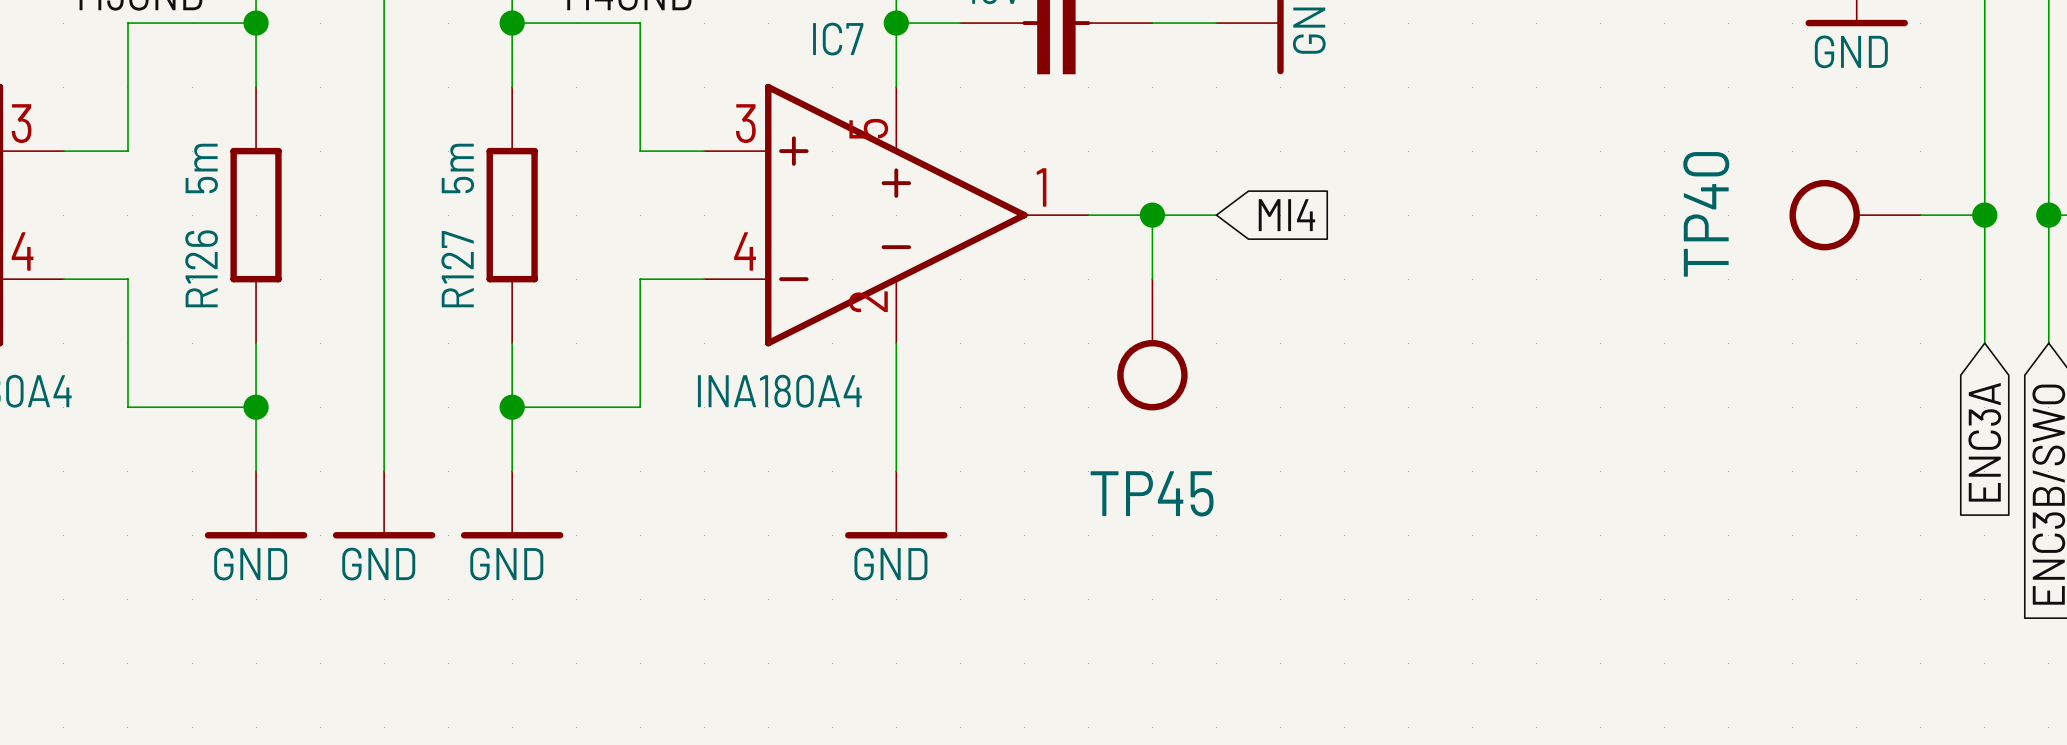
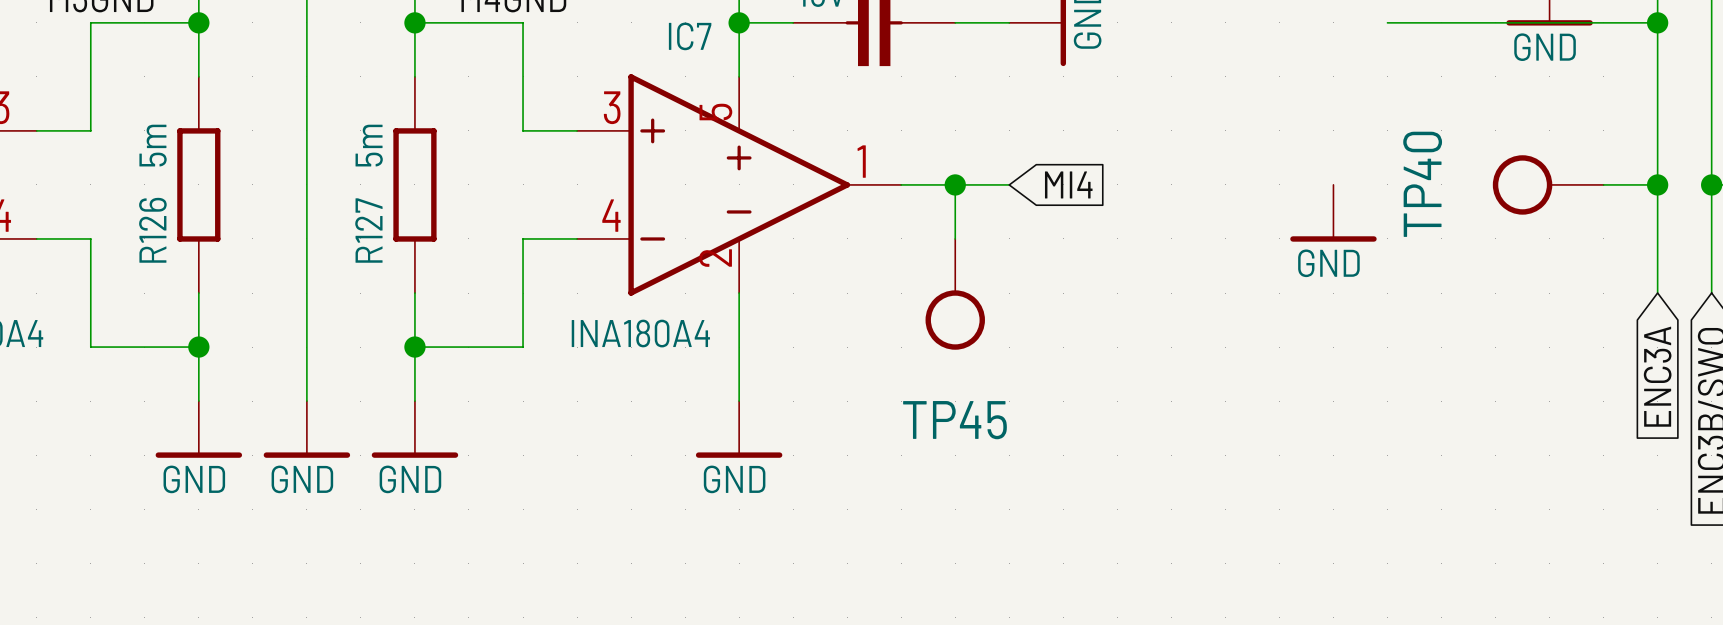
wire: none -> (1387, 22) (1657, 22)
junction: none -> (1657, 22)
power symbol: none -> GND (1333, 213)

